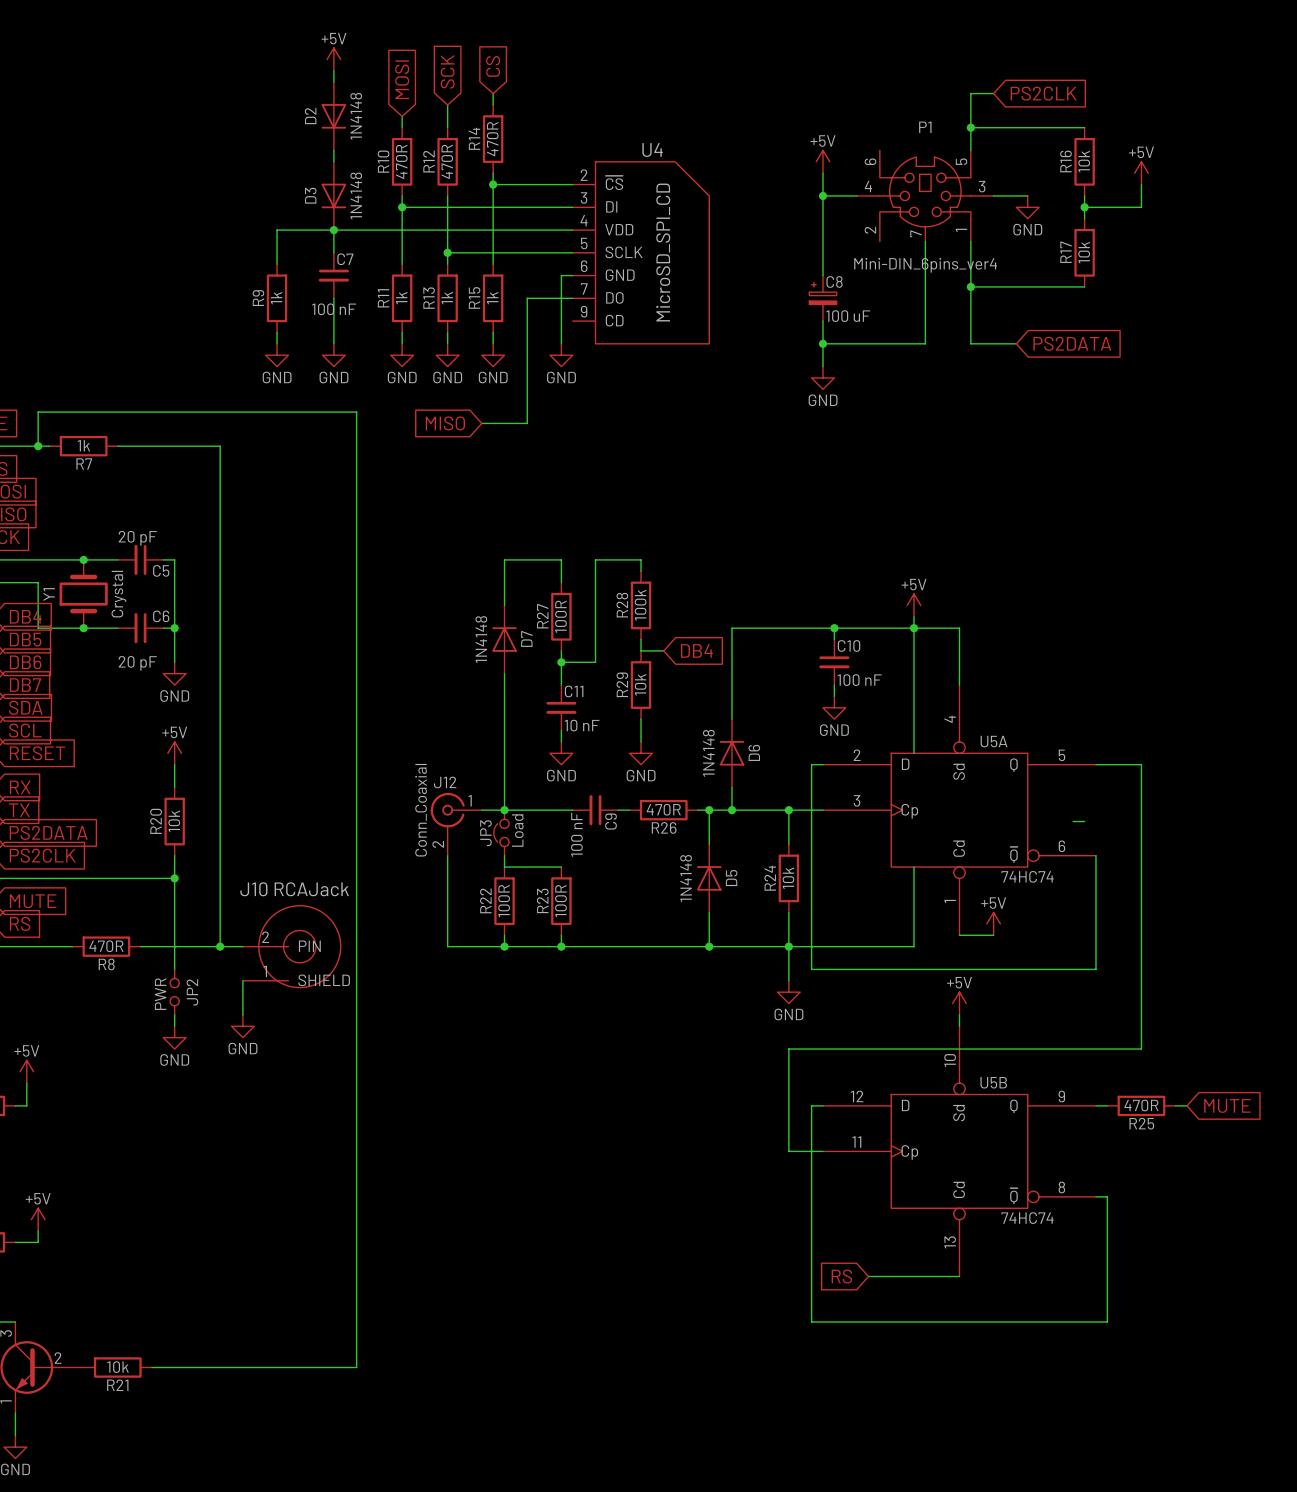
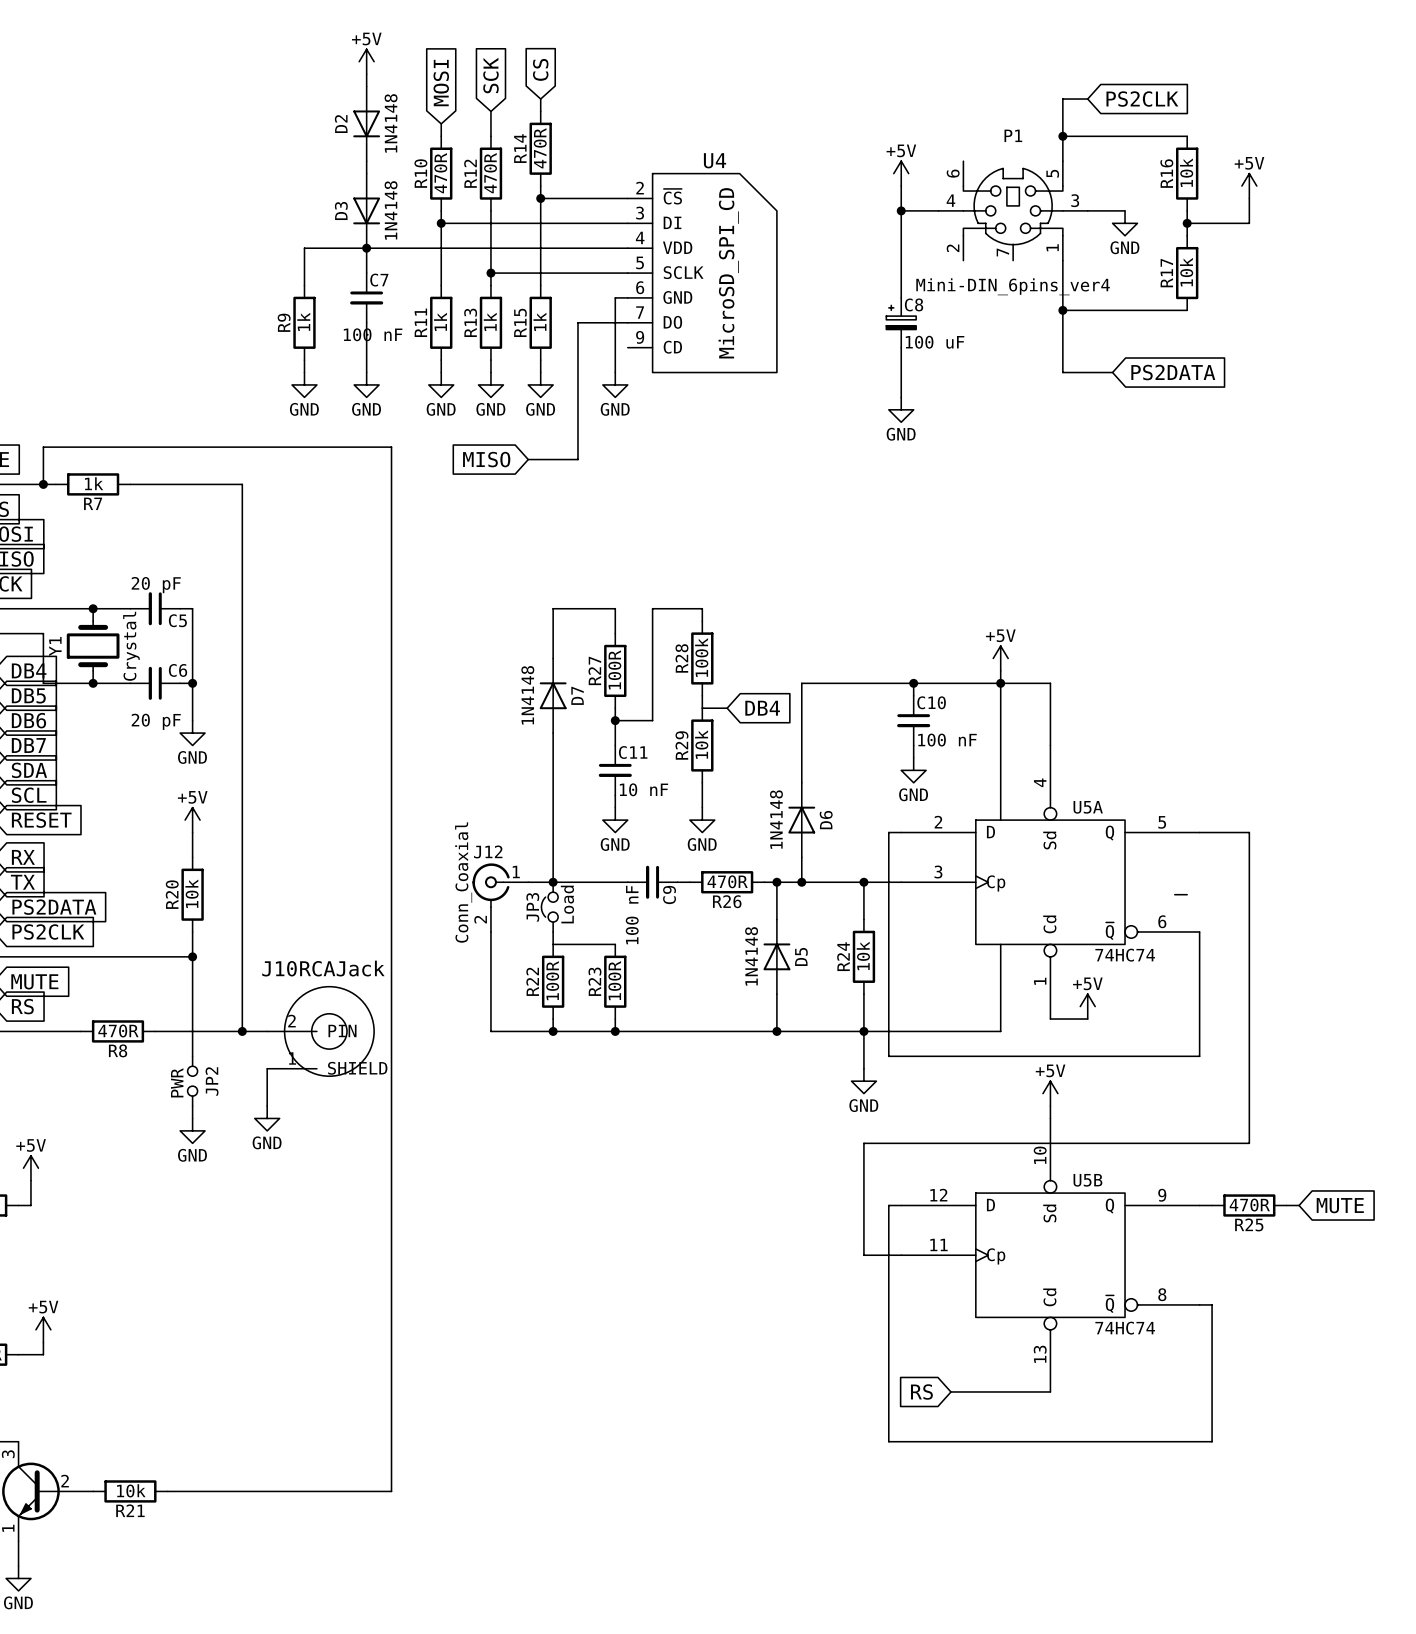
wire: (925, 241) (925, 343) (823, 343) -> none
junction: (823, 343) -> none

